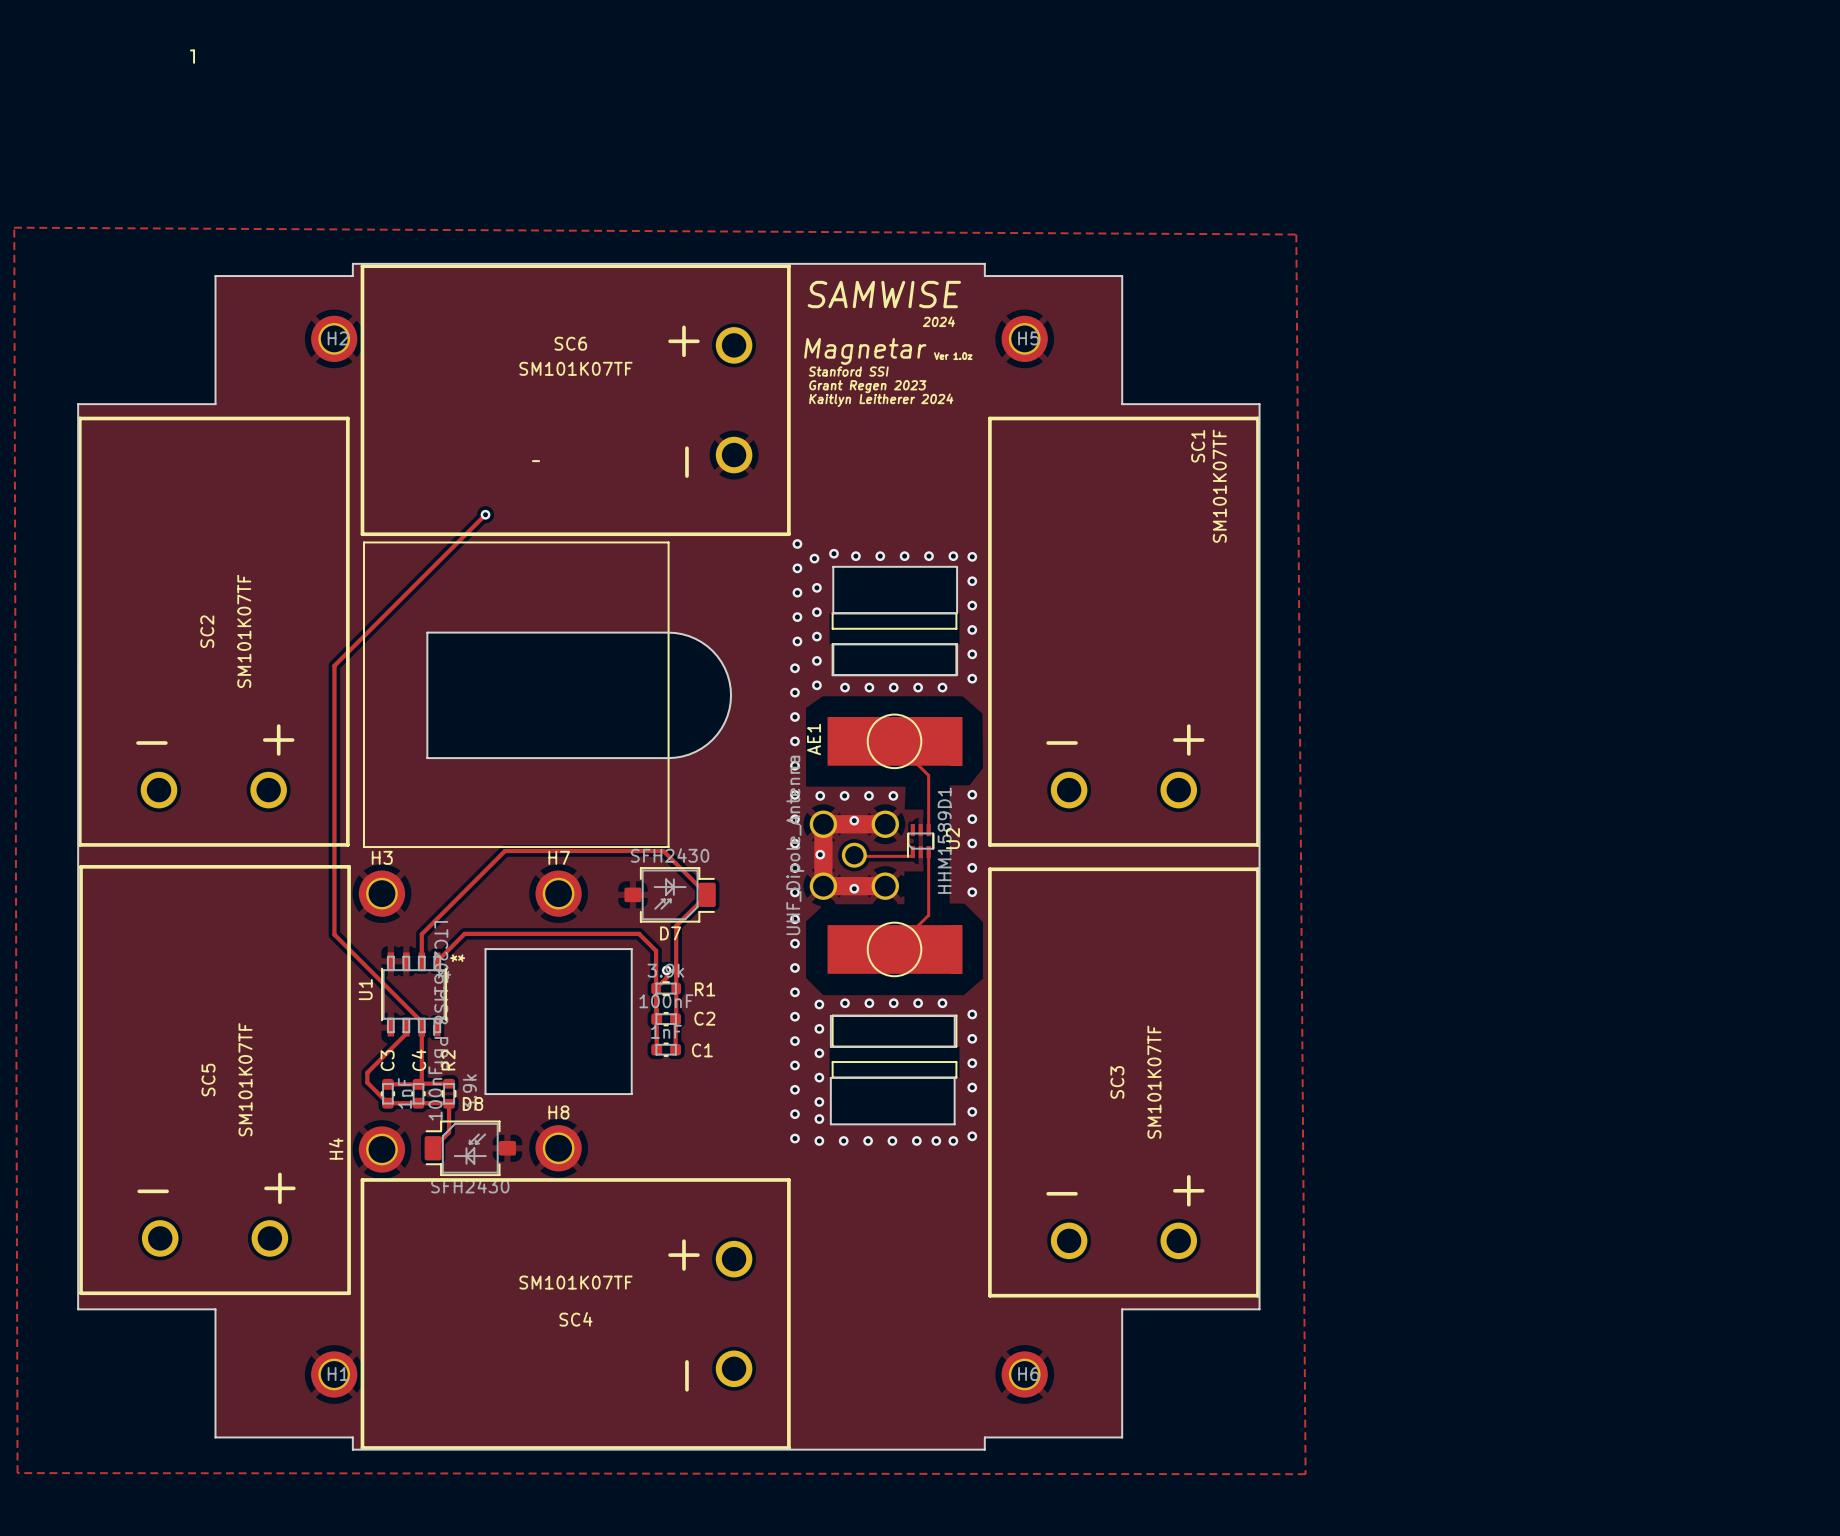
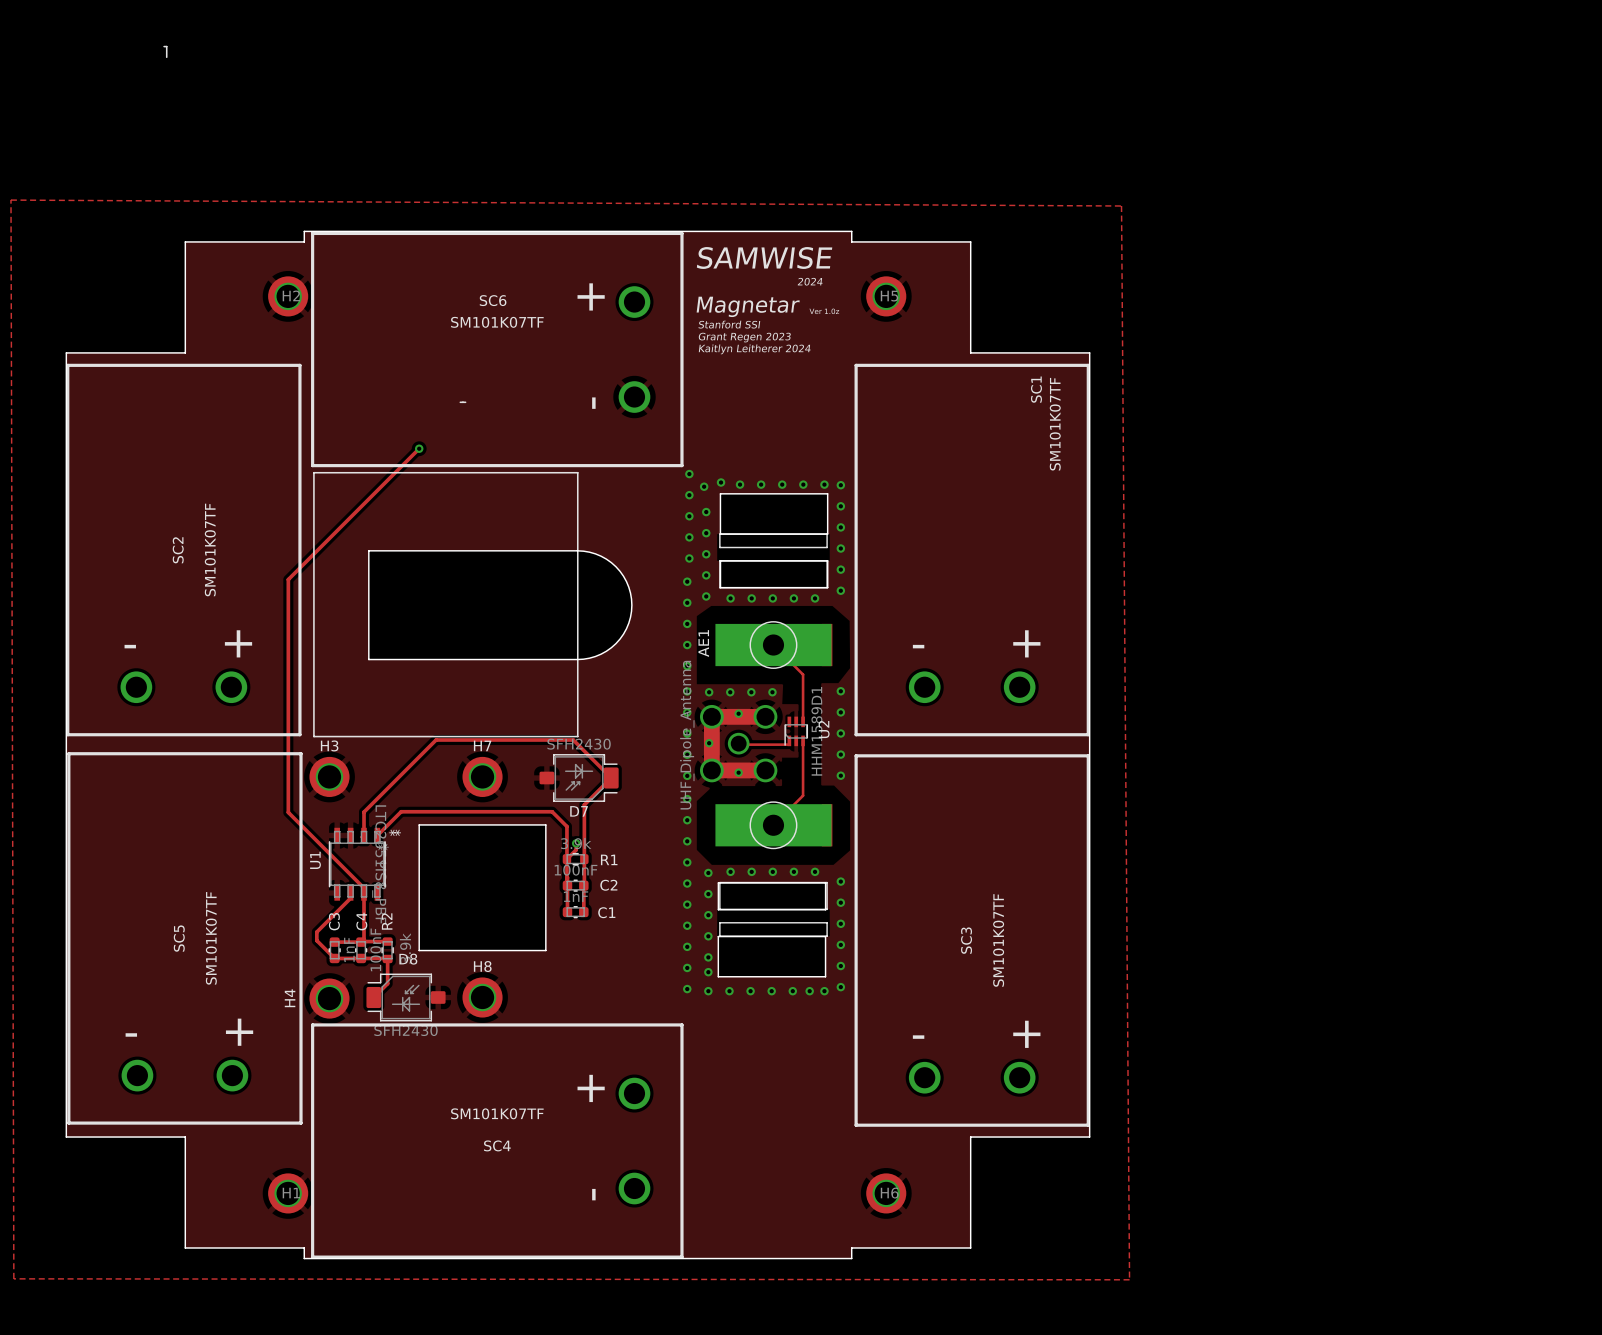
AE1 footprint: [827, 612, 963, 1079] -> [715, 533, 833, 937]

